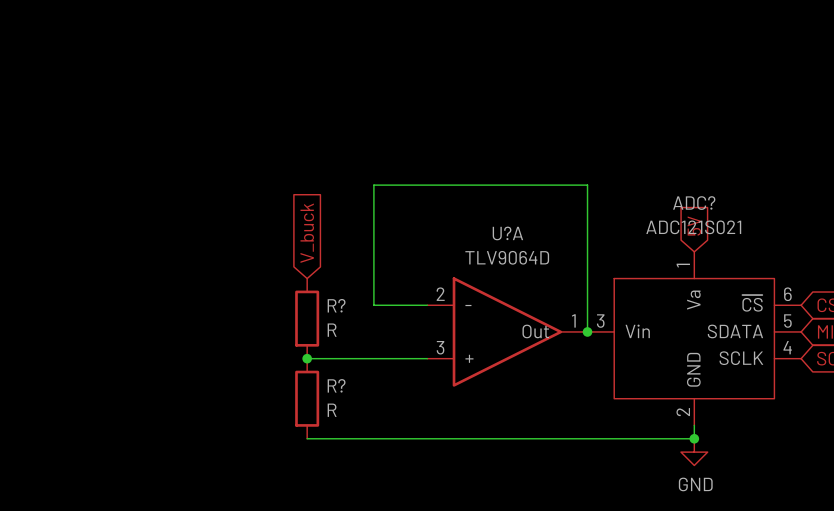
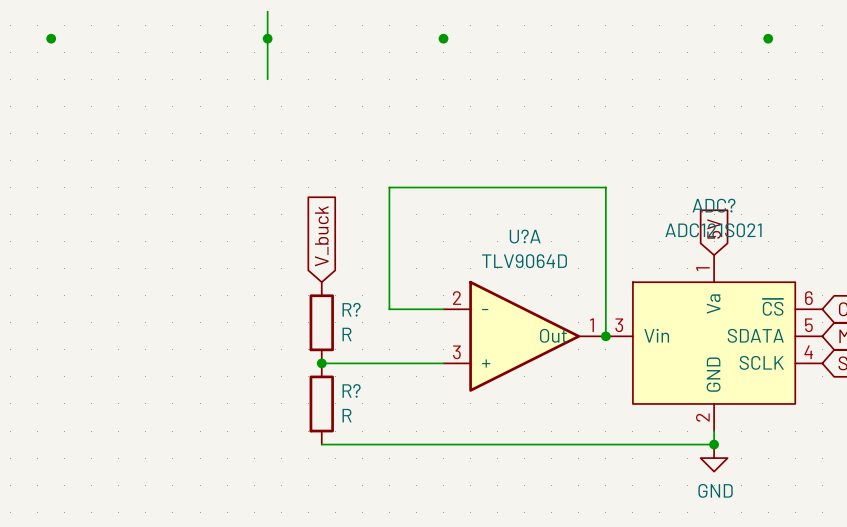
wire: none -> (267, 11) (267, 79)
junction: none -> (51, 38)
junction: none -> (267, 38)
junction: none -> (443, 38)
junction: none -> (768, 38)

